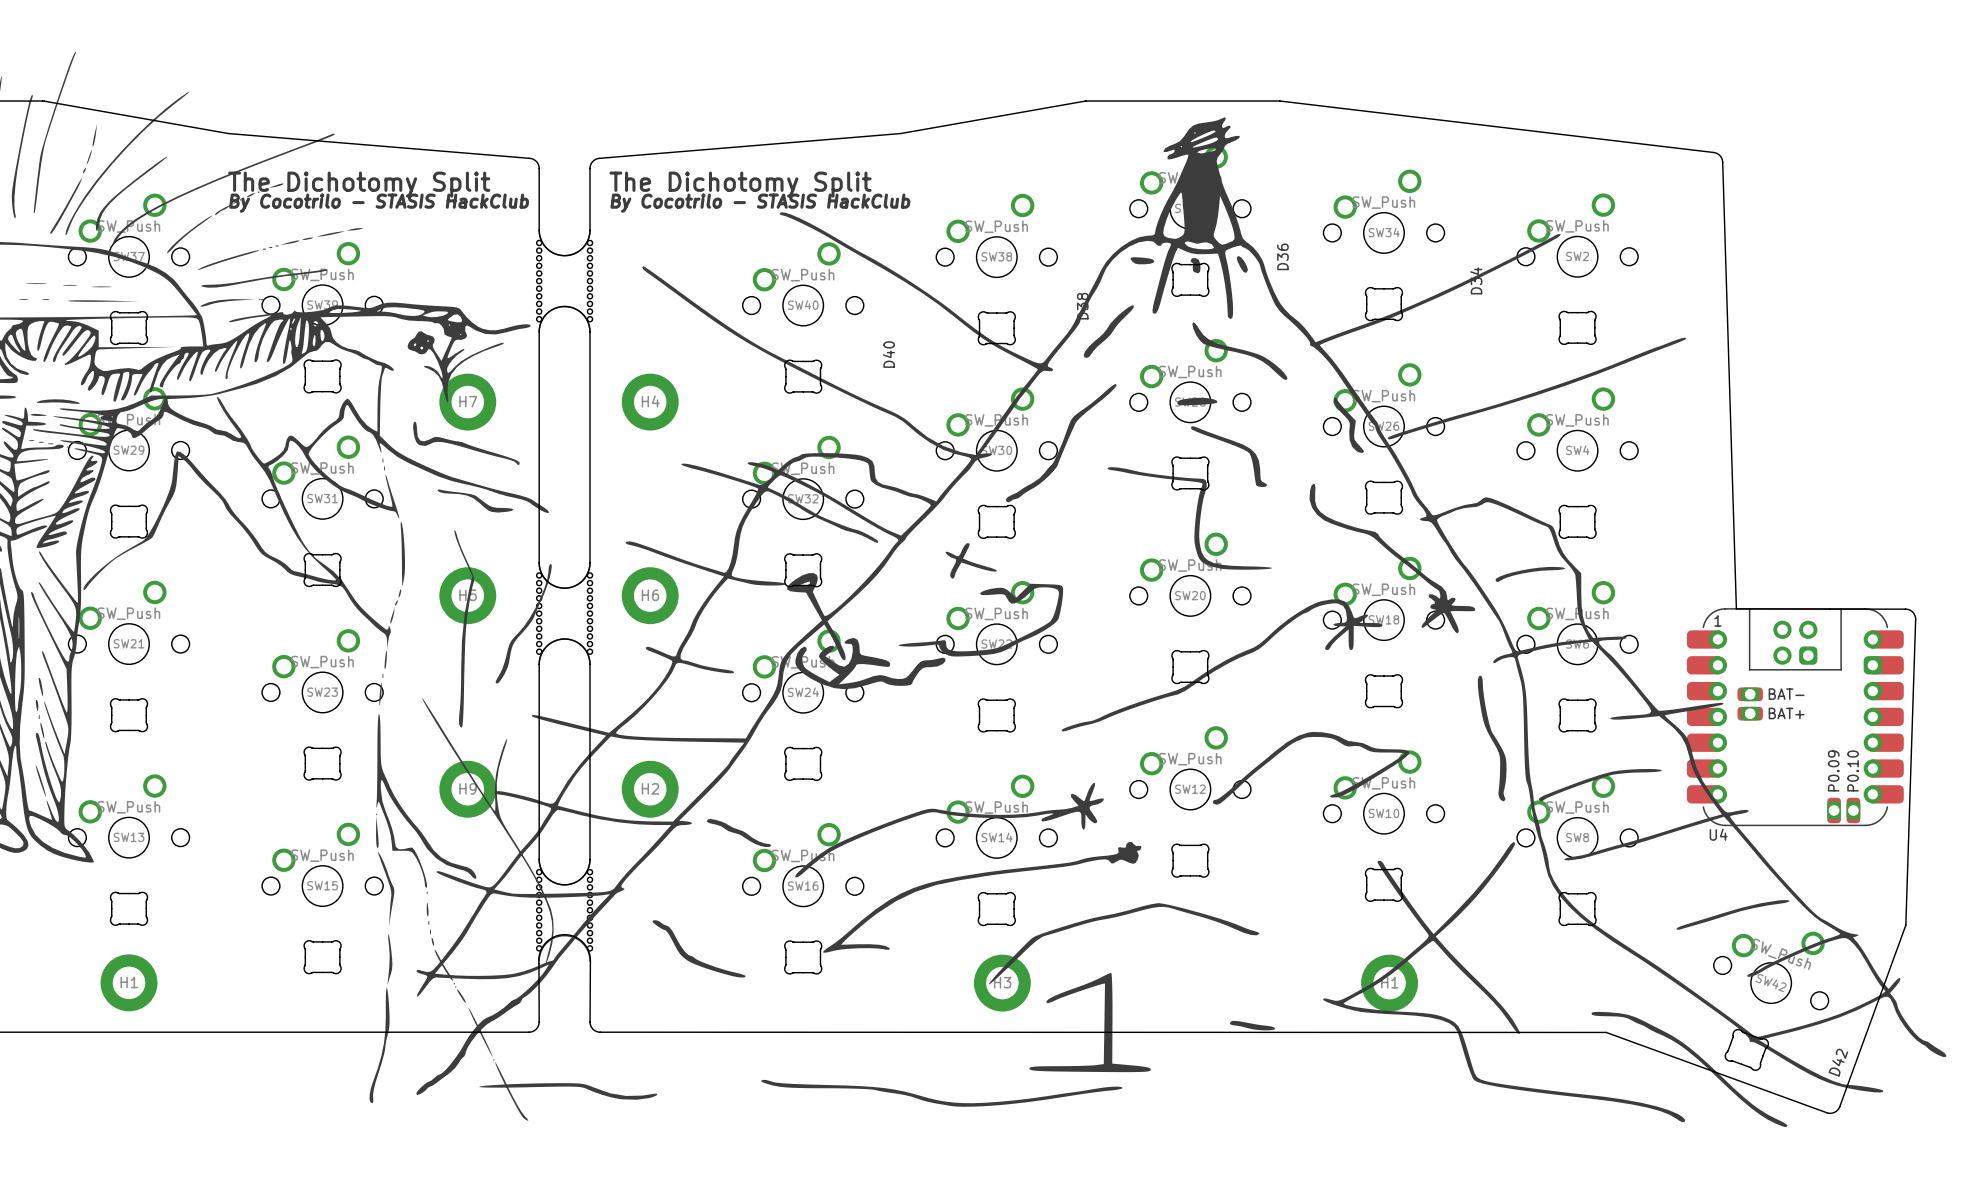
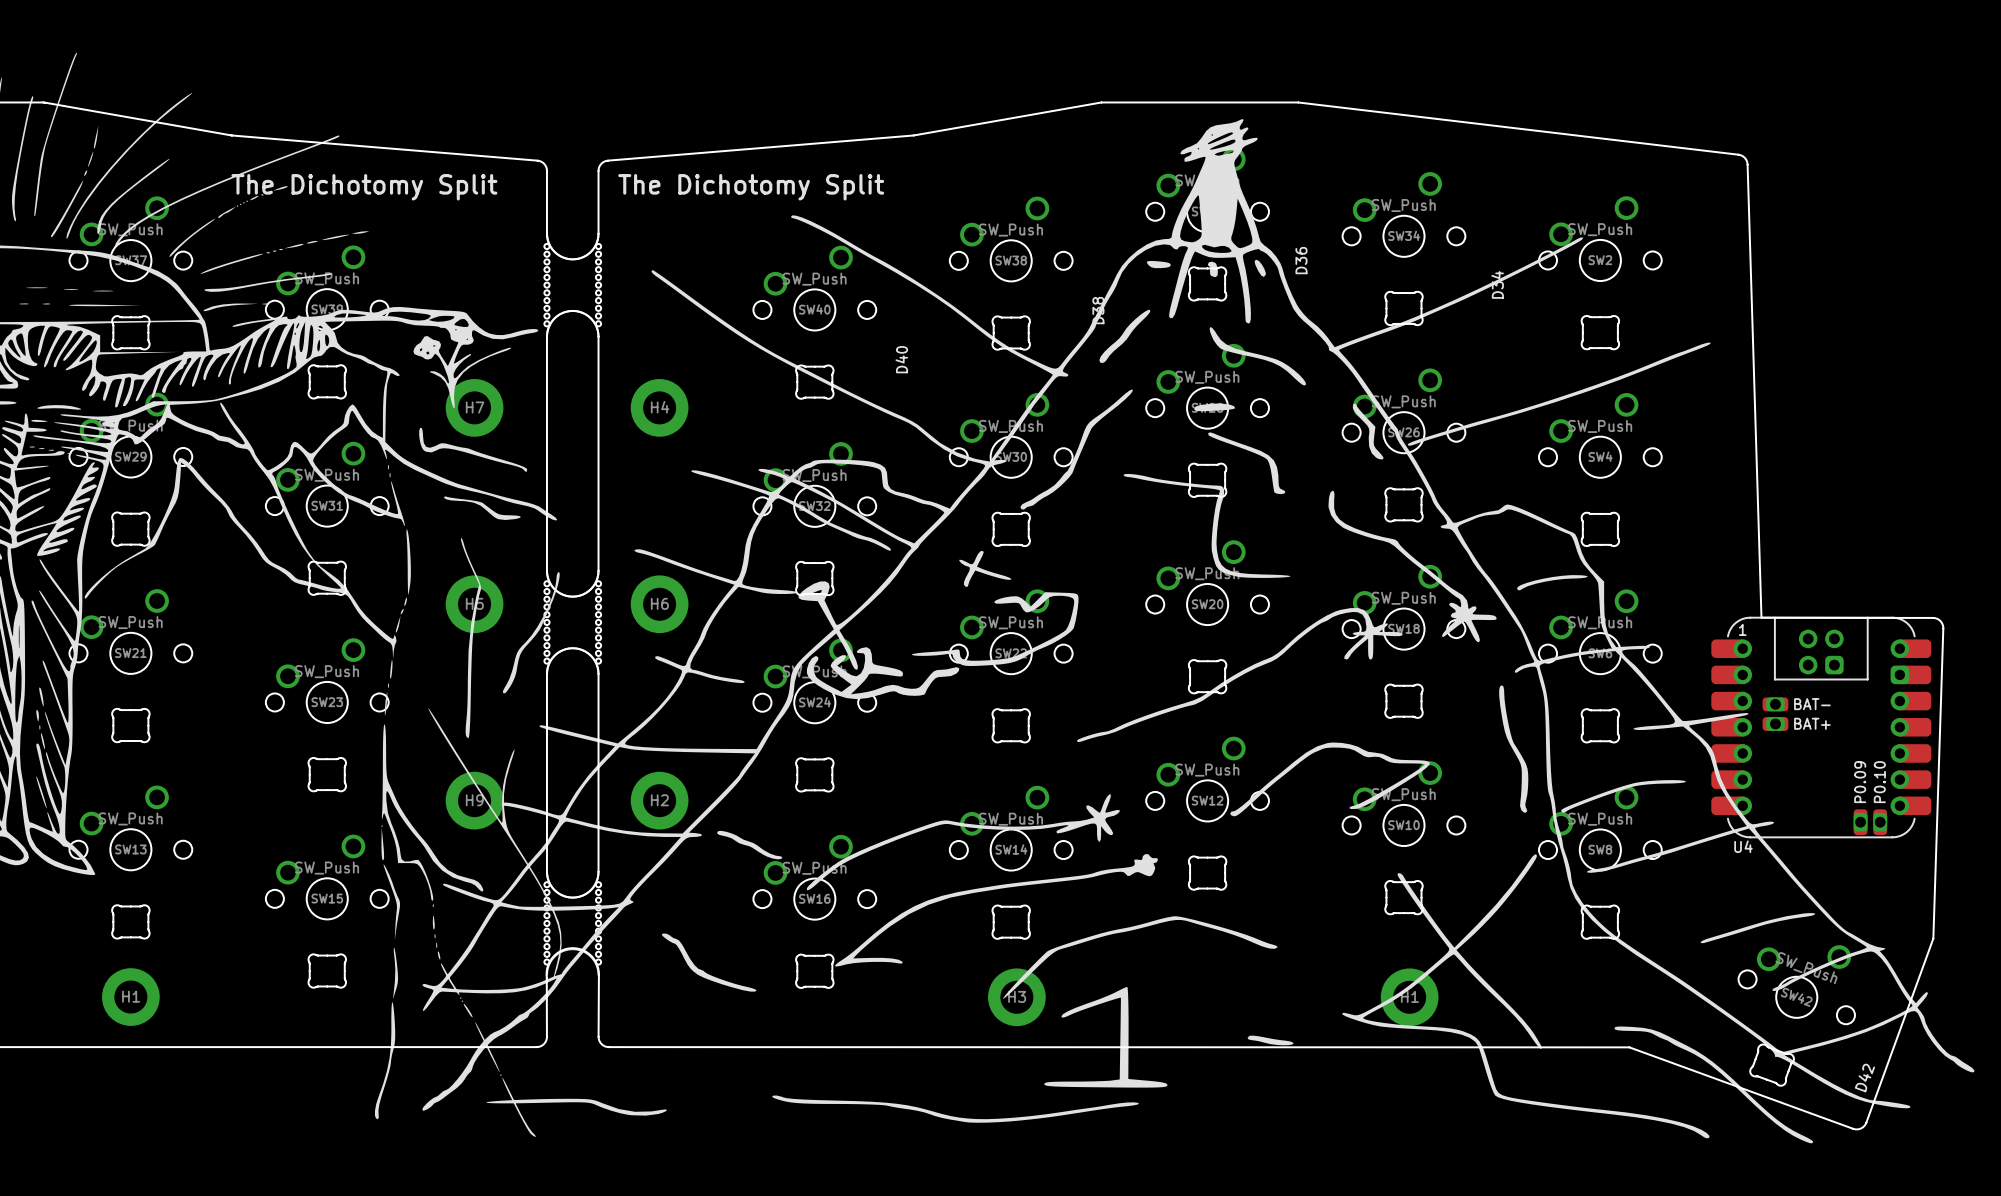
text: By Cocotrilo - STASIS HackClub (379, 203) -> none
text: By Cocotrilo - STASIS HackClub (760, 203) -> none

